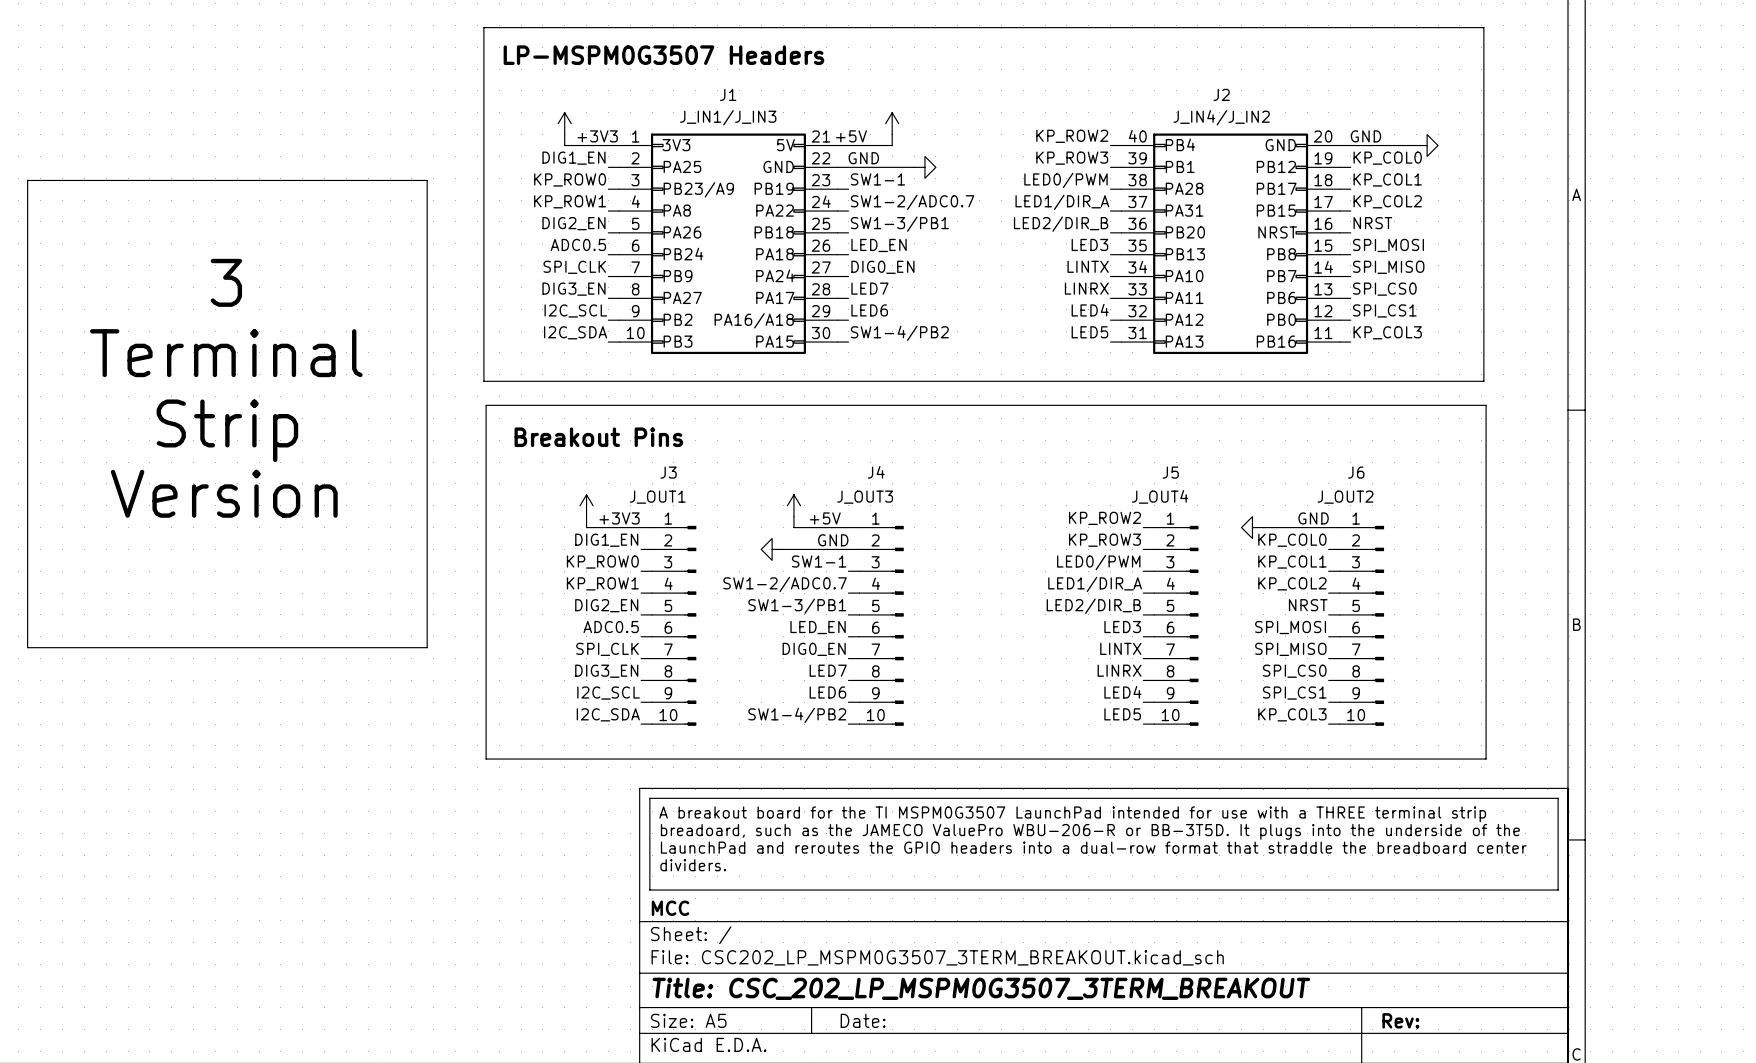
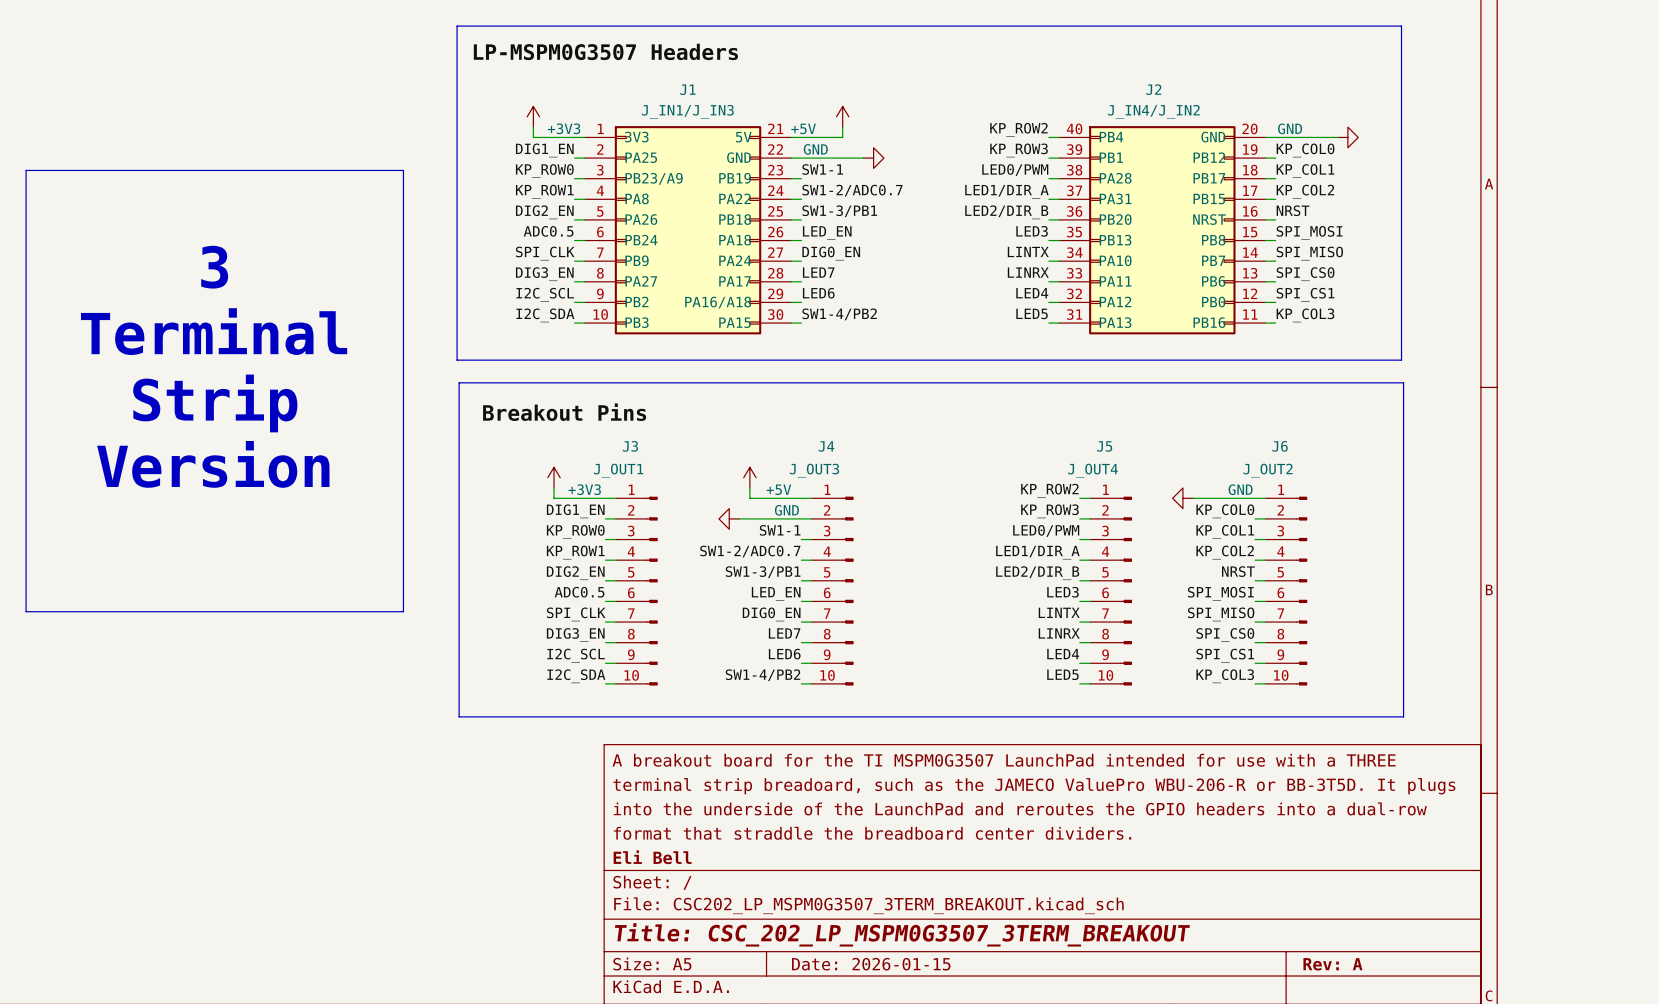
line: (649, 798) (1558, 798) (1558, 890) (649, 890) (649, 798) -> none
title block: none -> A breakout board for the TI MSPM0G3507 LaunchPad intended for use with a THREE (1004, 760)
text: A breakout board for the TI MSPM0G3507 LaunchPad intended for use with a THREE terminal strip (1072, 814) -> none
text: breadoard, such as the JAMECO ValuePro WBU-206-R or BB-3T5D. It plugs into the underside of the (1090, 831) -> none
title block: none -> terminal strip breadoard, such as the JAMECO ValuePro WBU-206-R or BB-3T5D. It plugs (1034, 786)
text: LaunchPad and reroutes the GPIO headers into a dual-row format that straddle the breadboard center (1093, 847) -> none
title block: none -> into the underside of the LaunchPad and reroutes the GPIO headers into a dual-row (1020, 808)
text: dividers. (693, 865) -> none
title block: none -> format that straddle the breadboard center dividers. (872, 833)
title block: MCC (670, 908) -> Eli Bell (652, 857)
title block: Date: (863, 1020) -> Date: 2026-01-15 (871, 964)
title block: Rev: (1400, 1020) -> Rev: A (1332, 964)

